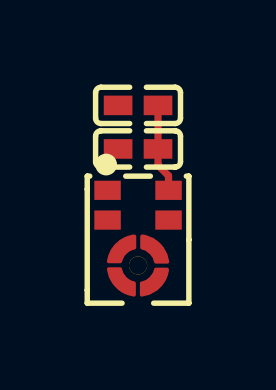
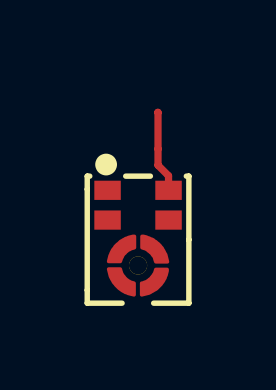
part: (138, 105) -> none
part: (138, 148) -> none

